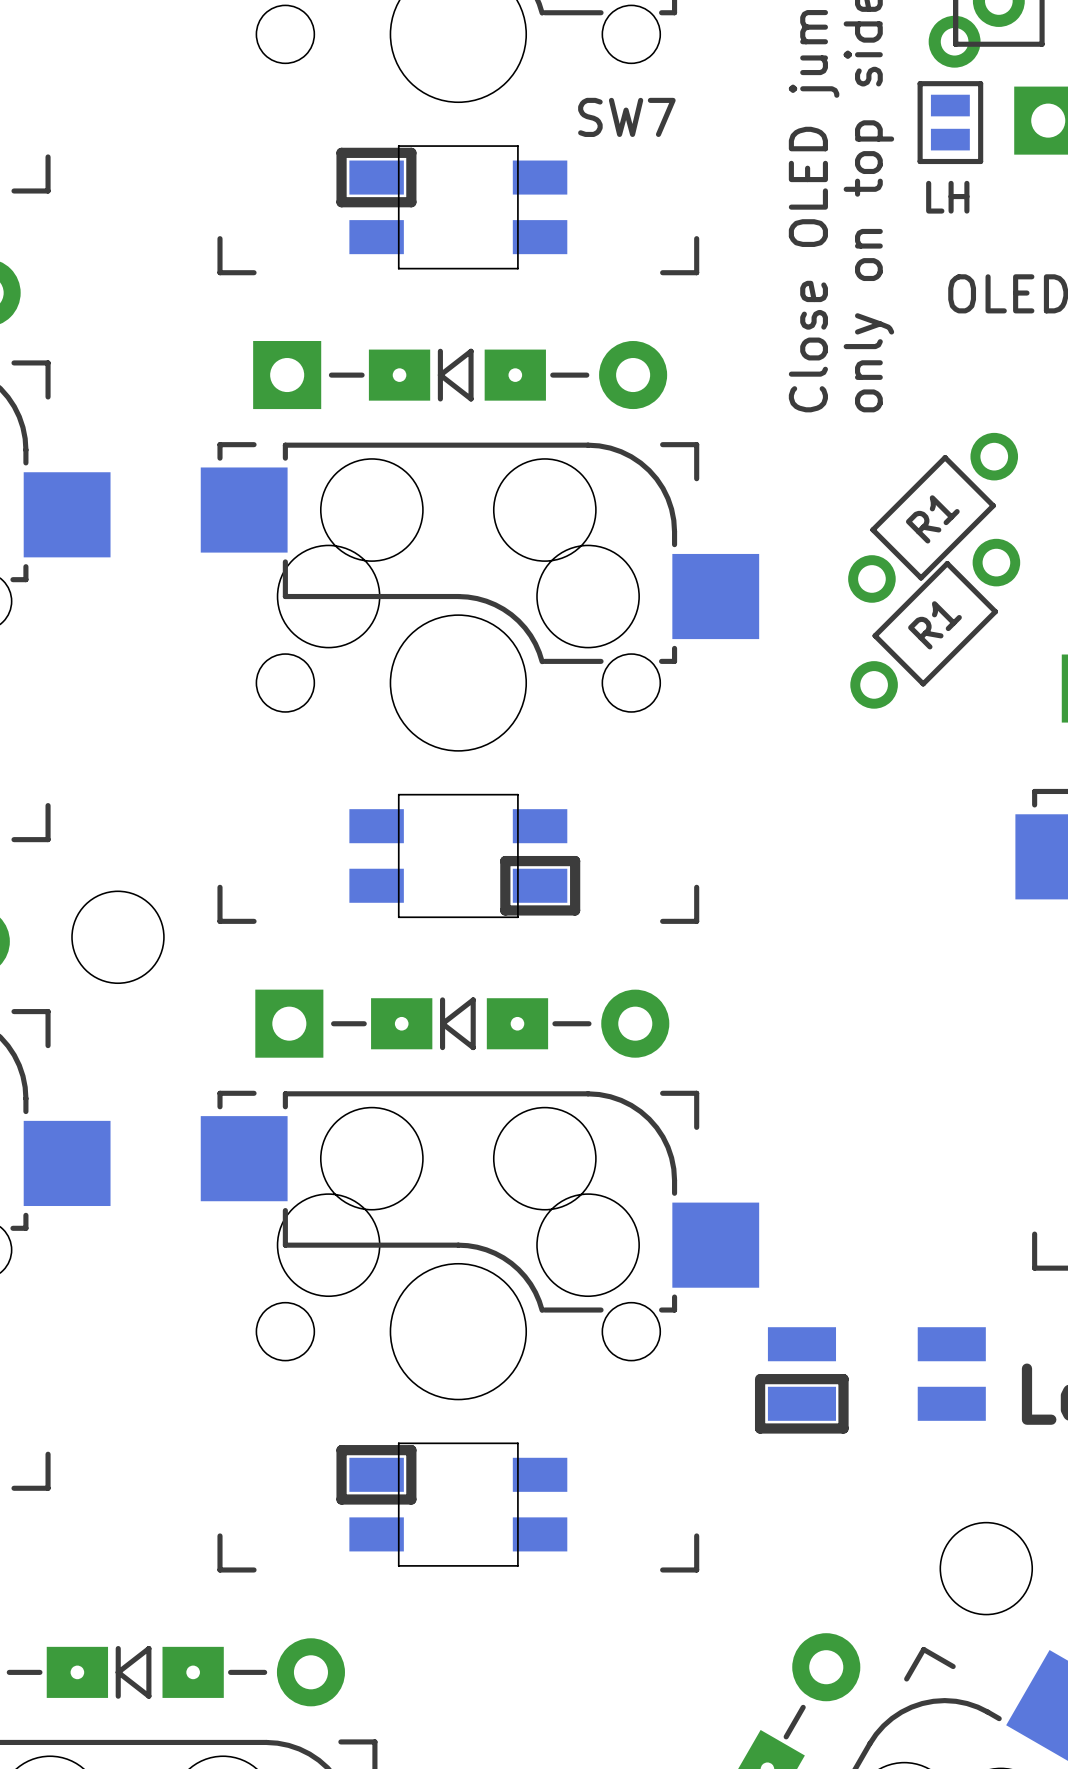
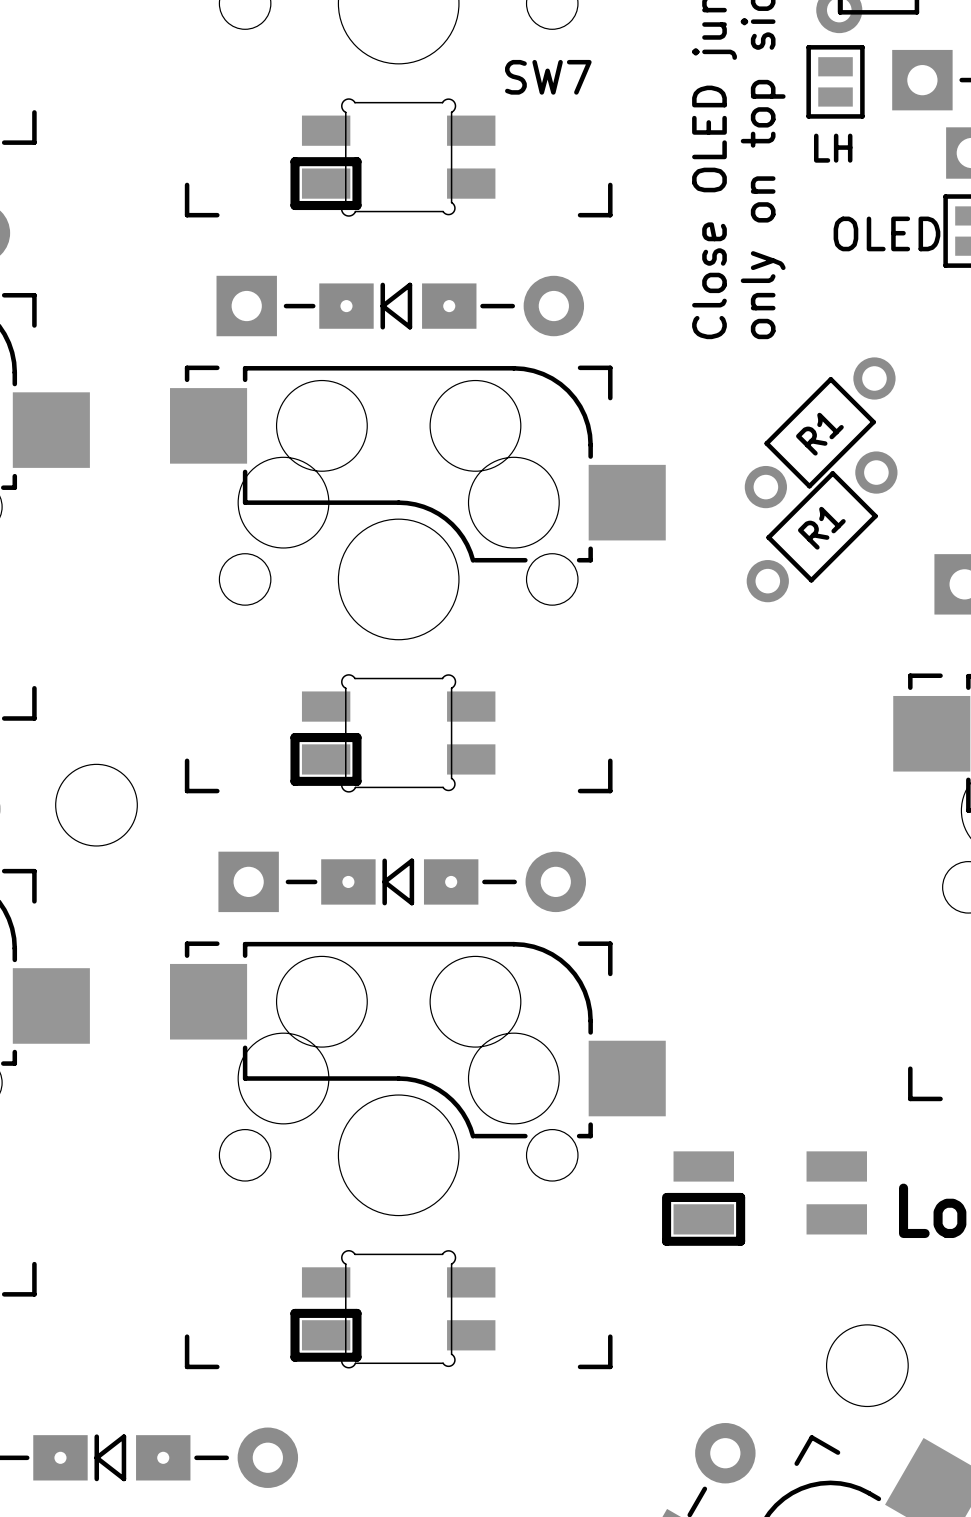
part footprint: [336, 145, 568, 270] -> [290, 98, 496, 217]
part footprint: [349, 793, 581, 919] -> [290, 674, 496, 793]
part footprint: [336, 1442, 568, 1567] -> [290, 1250, 496, 1369]

